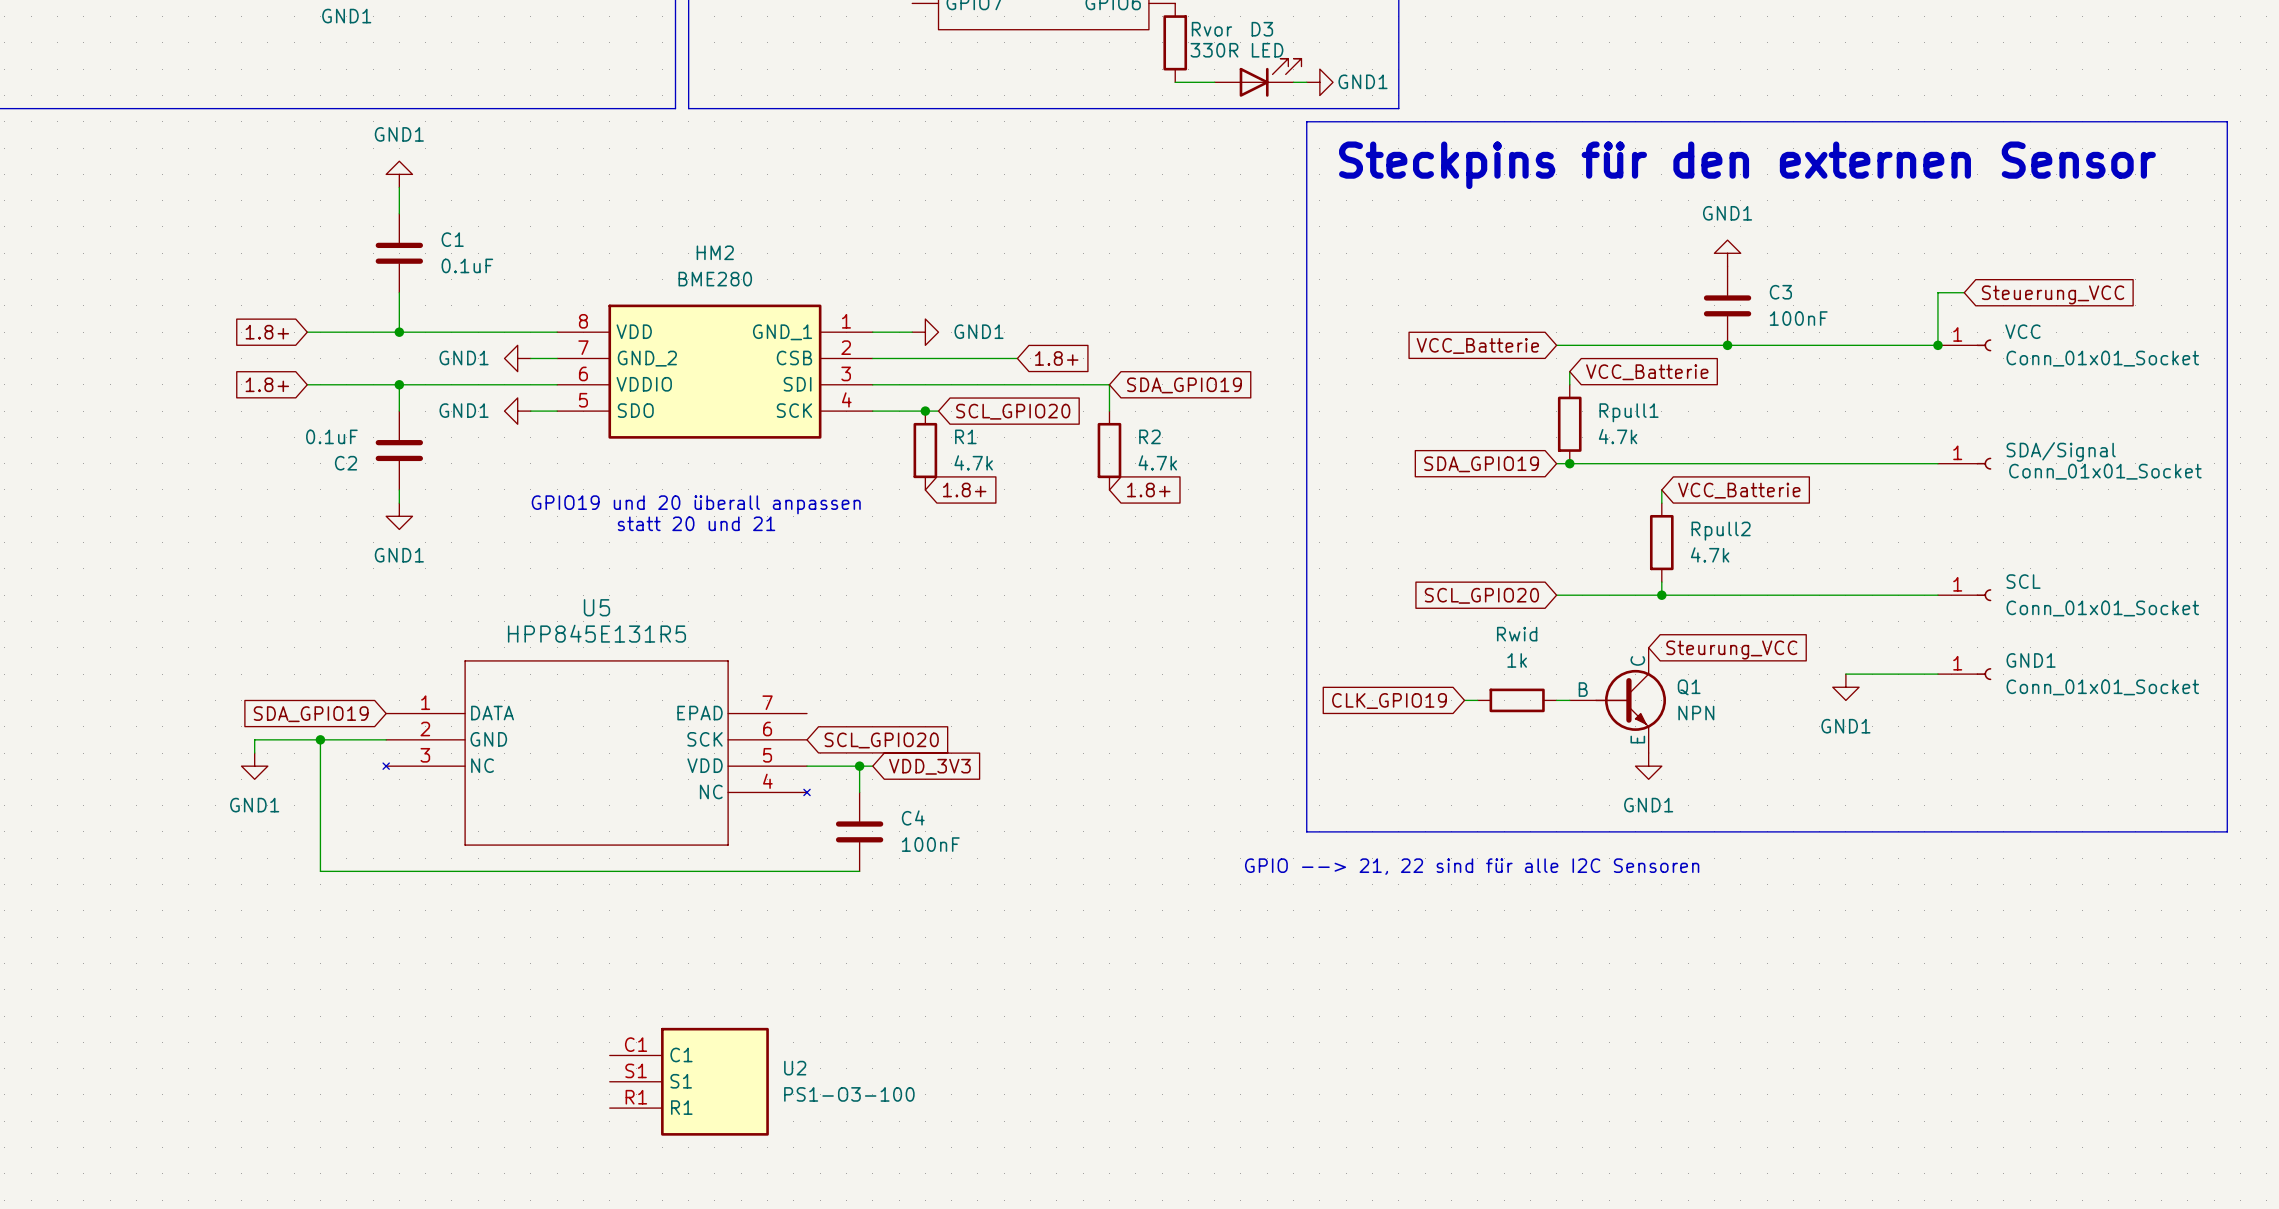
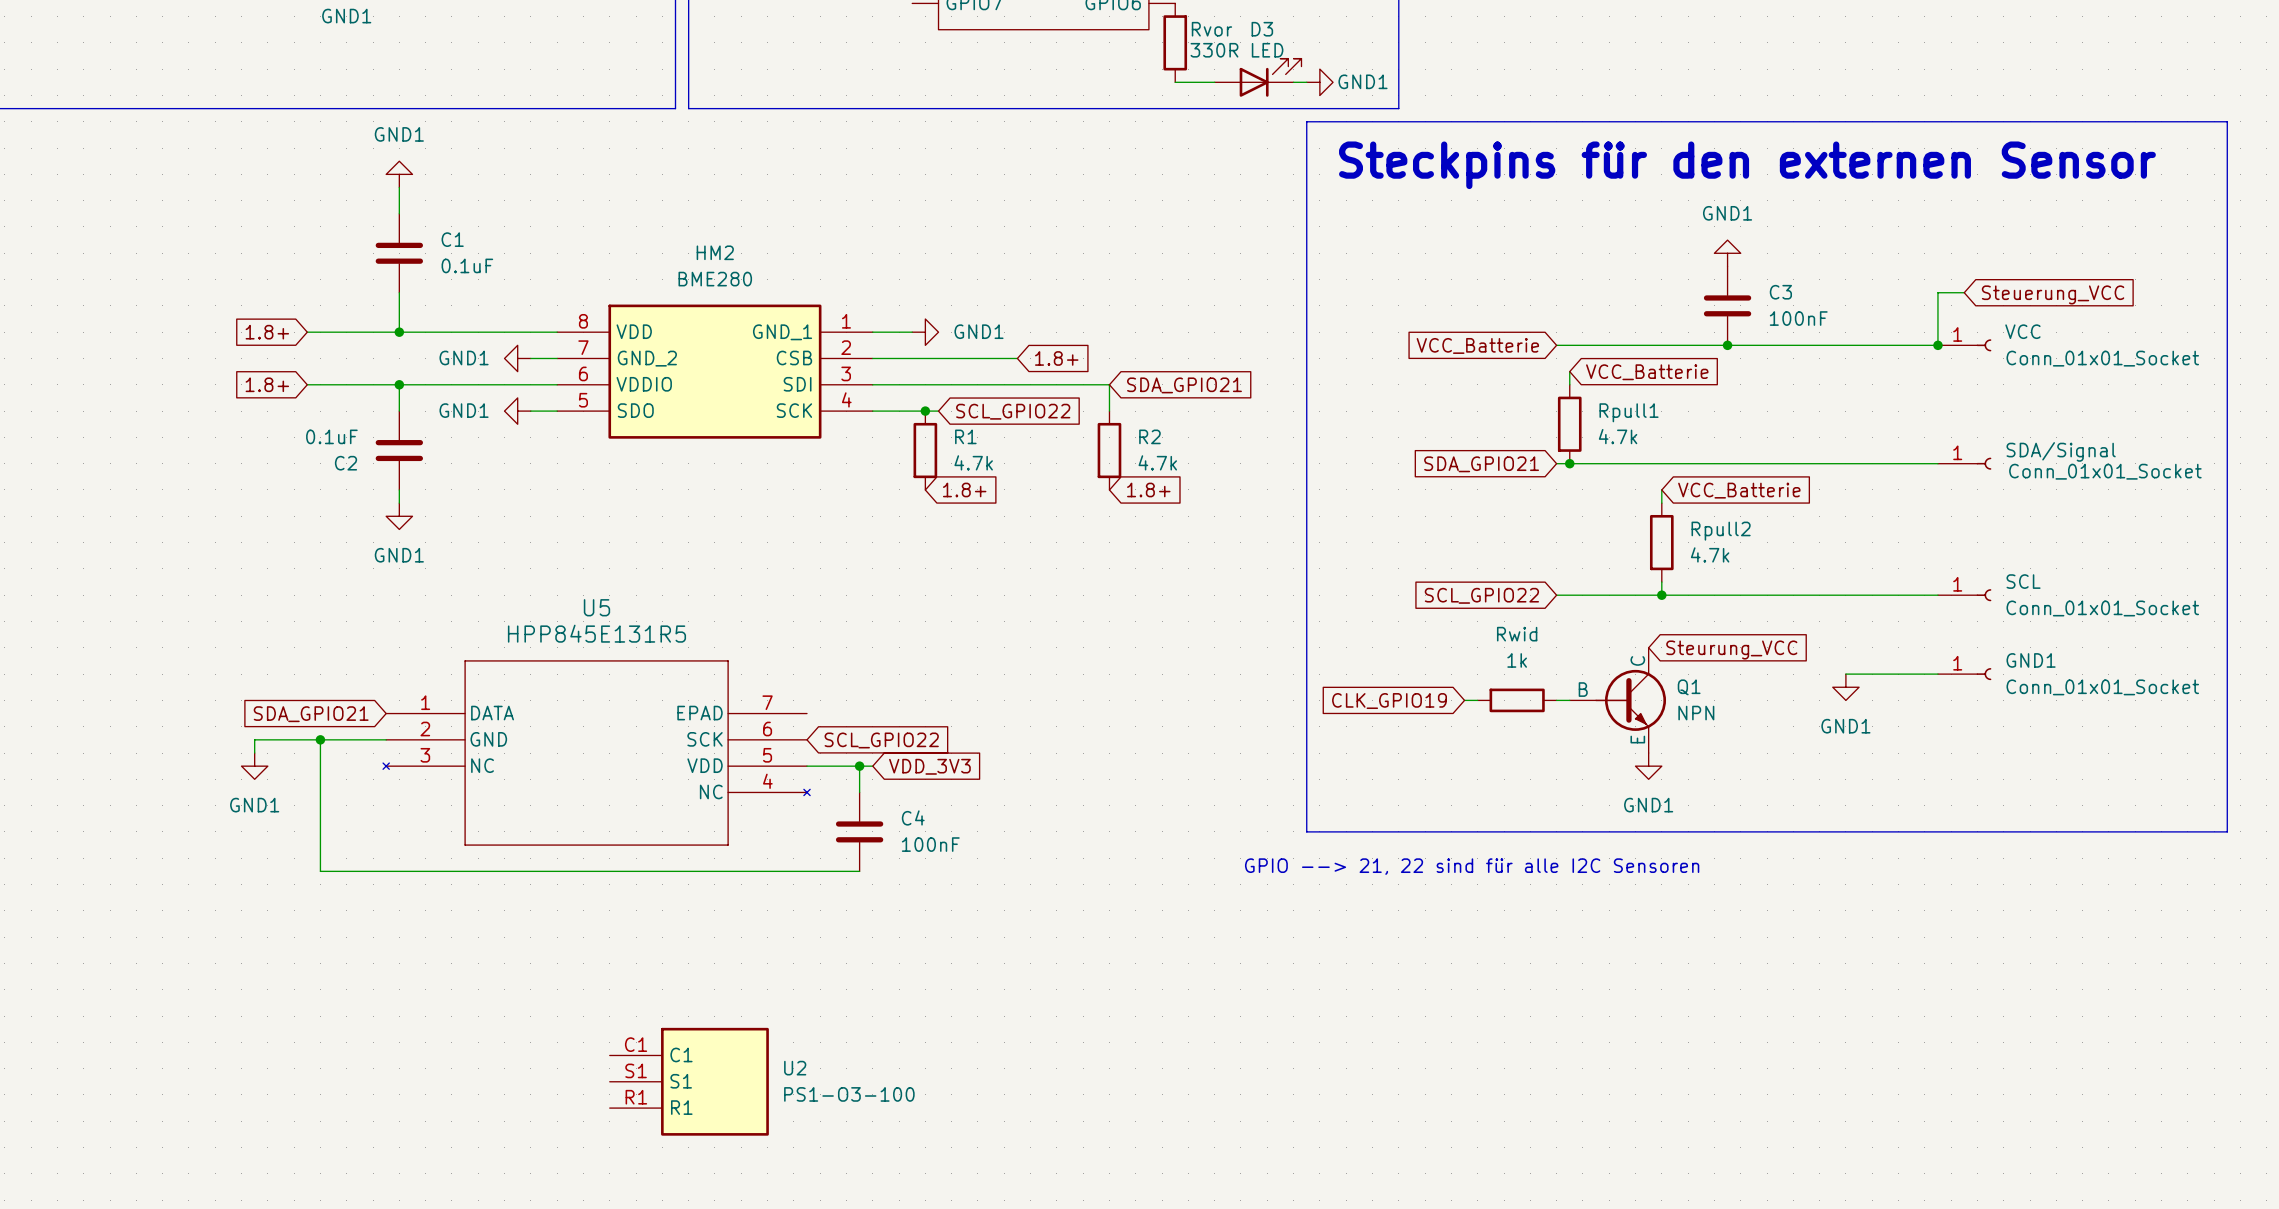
global label: SDA_GPIO19 (1184, 385) -> SDA_GPIO21 (1184, 385)
global label: SCL_GPIO20 (1013, 411) -> SCL_GPIO22 (1013, 411)
global label: SDA_GPIO19 (1481, 464) -> SDA_GPIO21 (1481, 464)
text: GPIO19 und 20 überall anpassen (696, 504) -> none
text: statt 20 und 21 (696, 523) -> none
global label: SCL_GPIO20 (1481, 595) -> SCL_GPIO22 (1481, 595)
global label: SDA_GPIO19 (311, 714) -> SDA_GPIO21 (311, 714)
global label: SCL_GPIO20 (881, 740) -> SCL_GPIO22 (881, 740)

